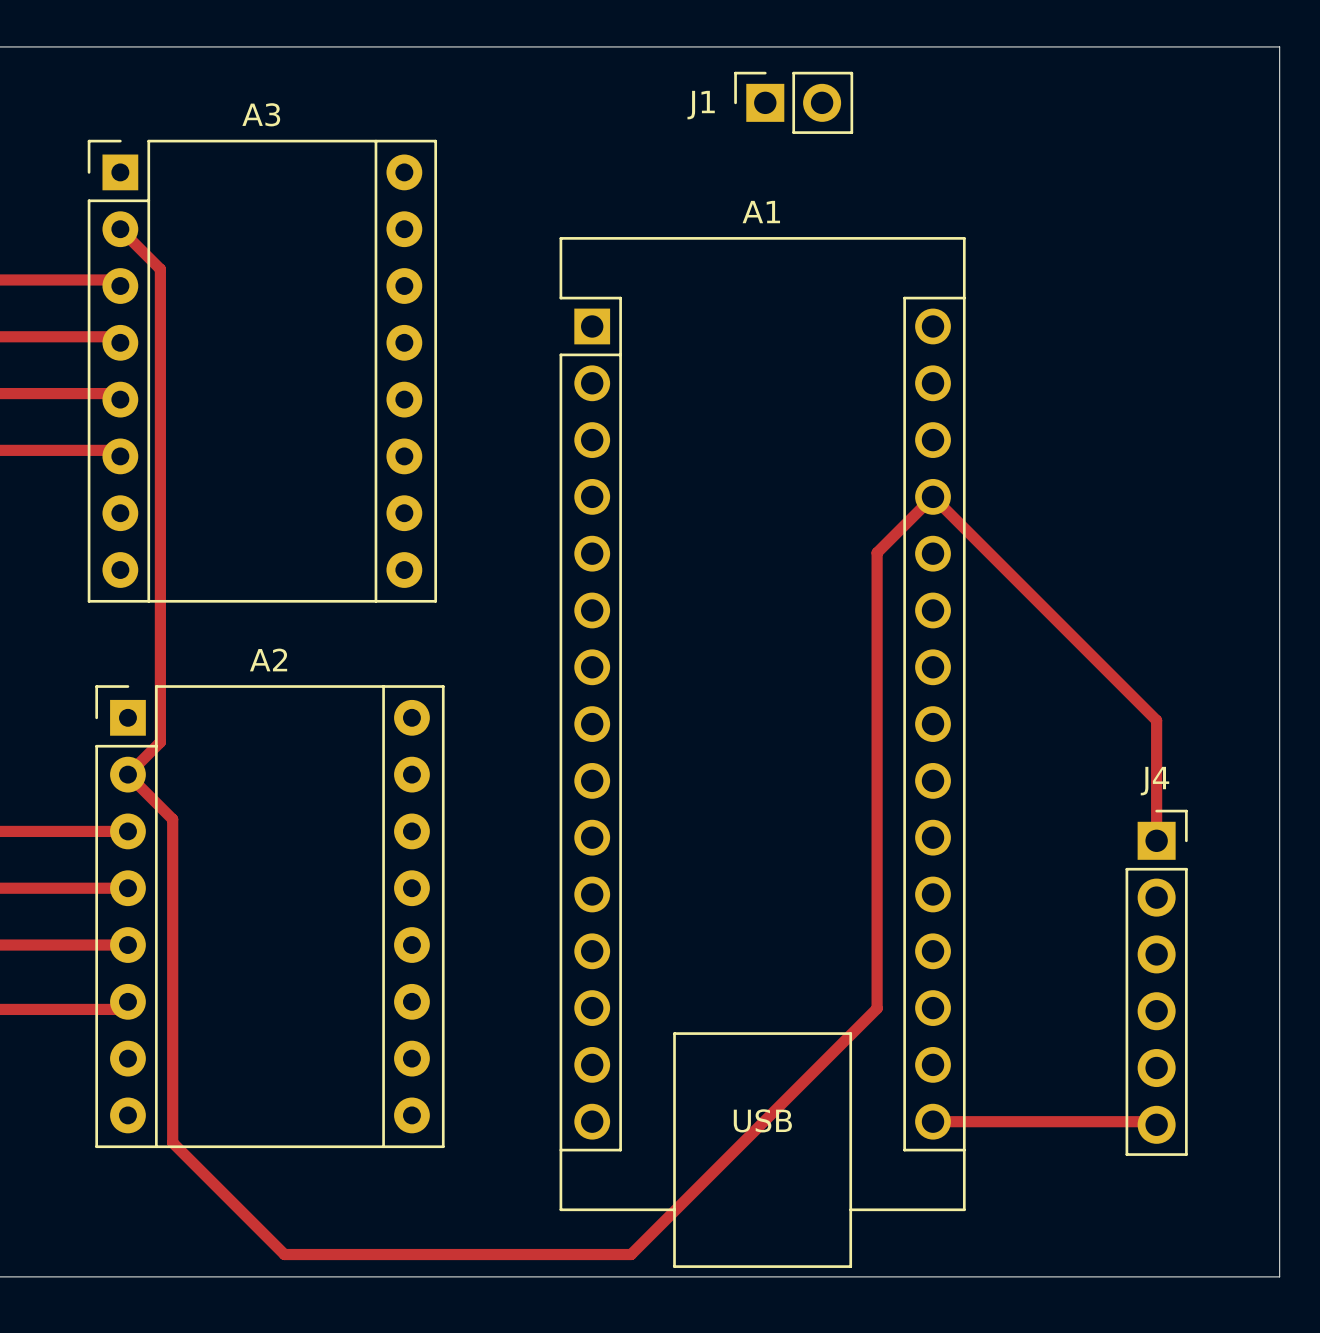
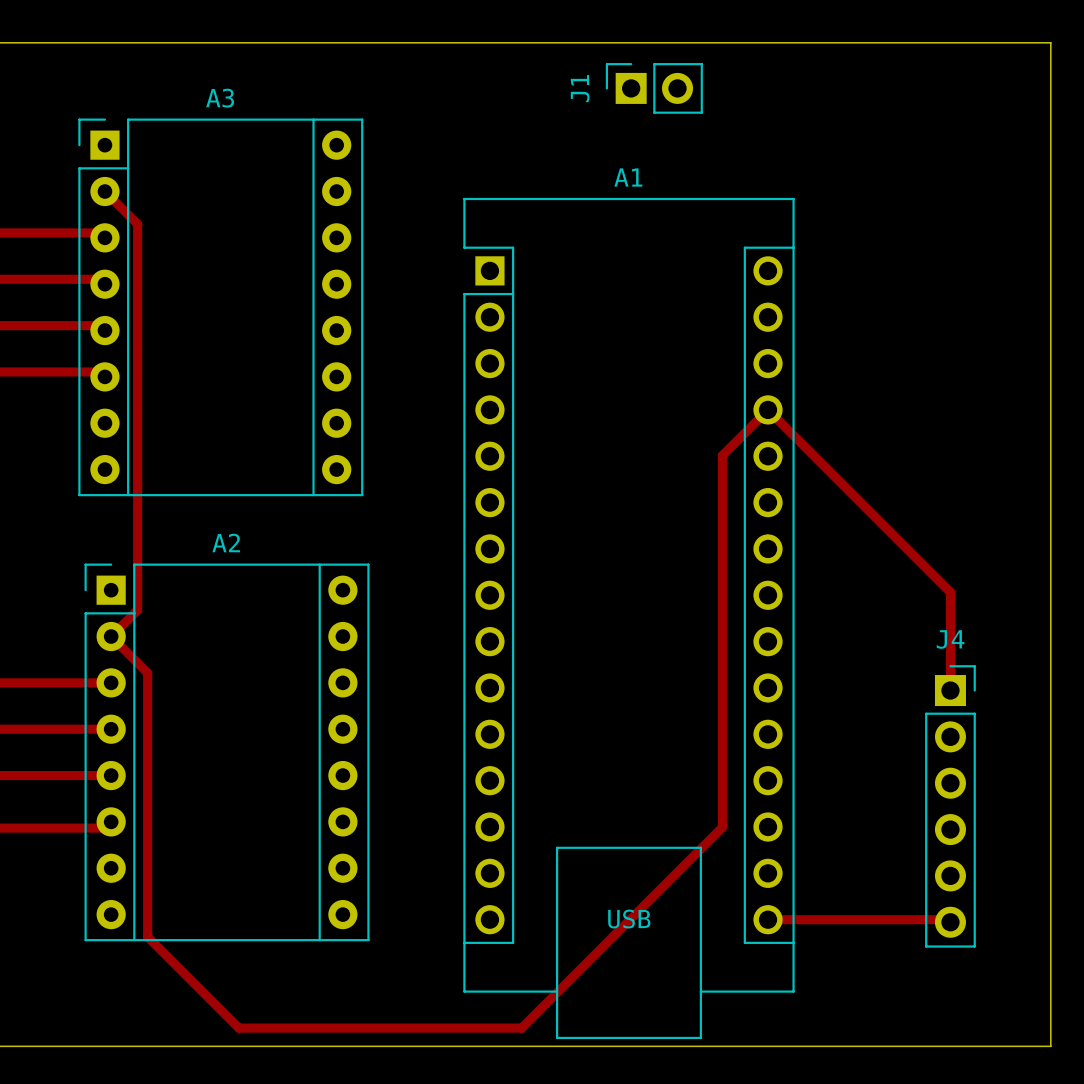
J1 name rotation: 0° (701, 105) -> 90° counterclockwise (580, 88)

